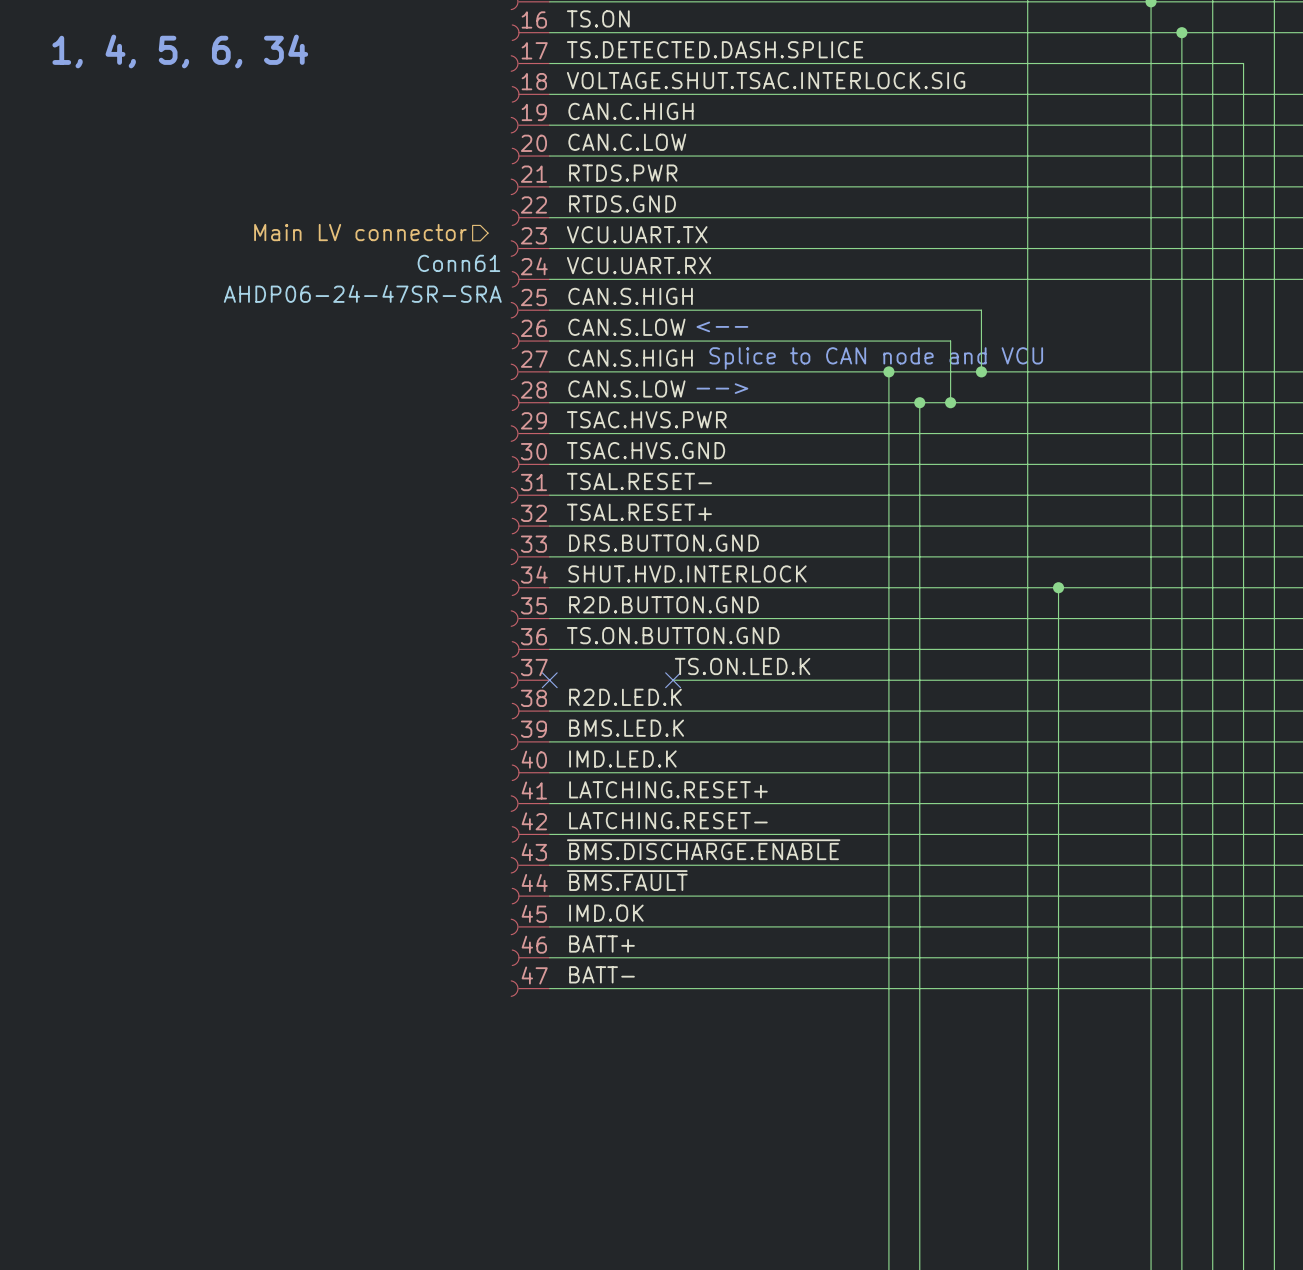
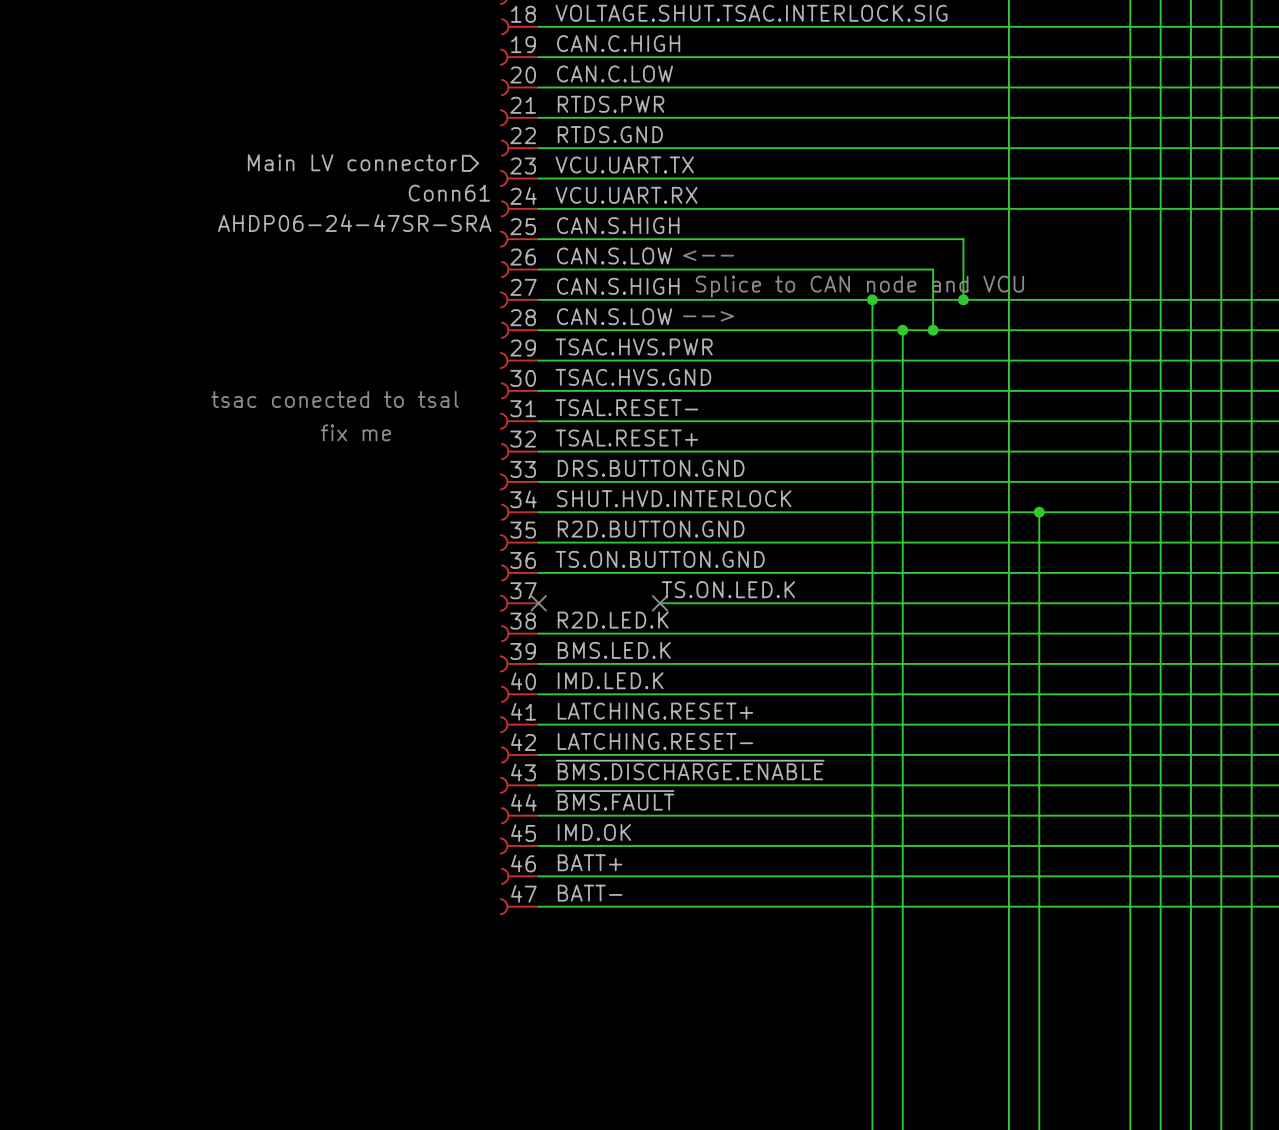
text: none -> tsac conected to tsal (335, 399)
text: none -> fix me (355, 432)

